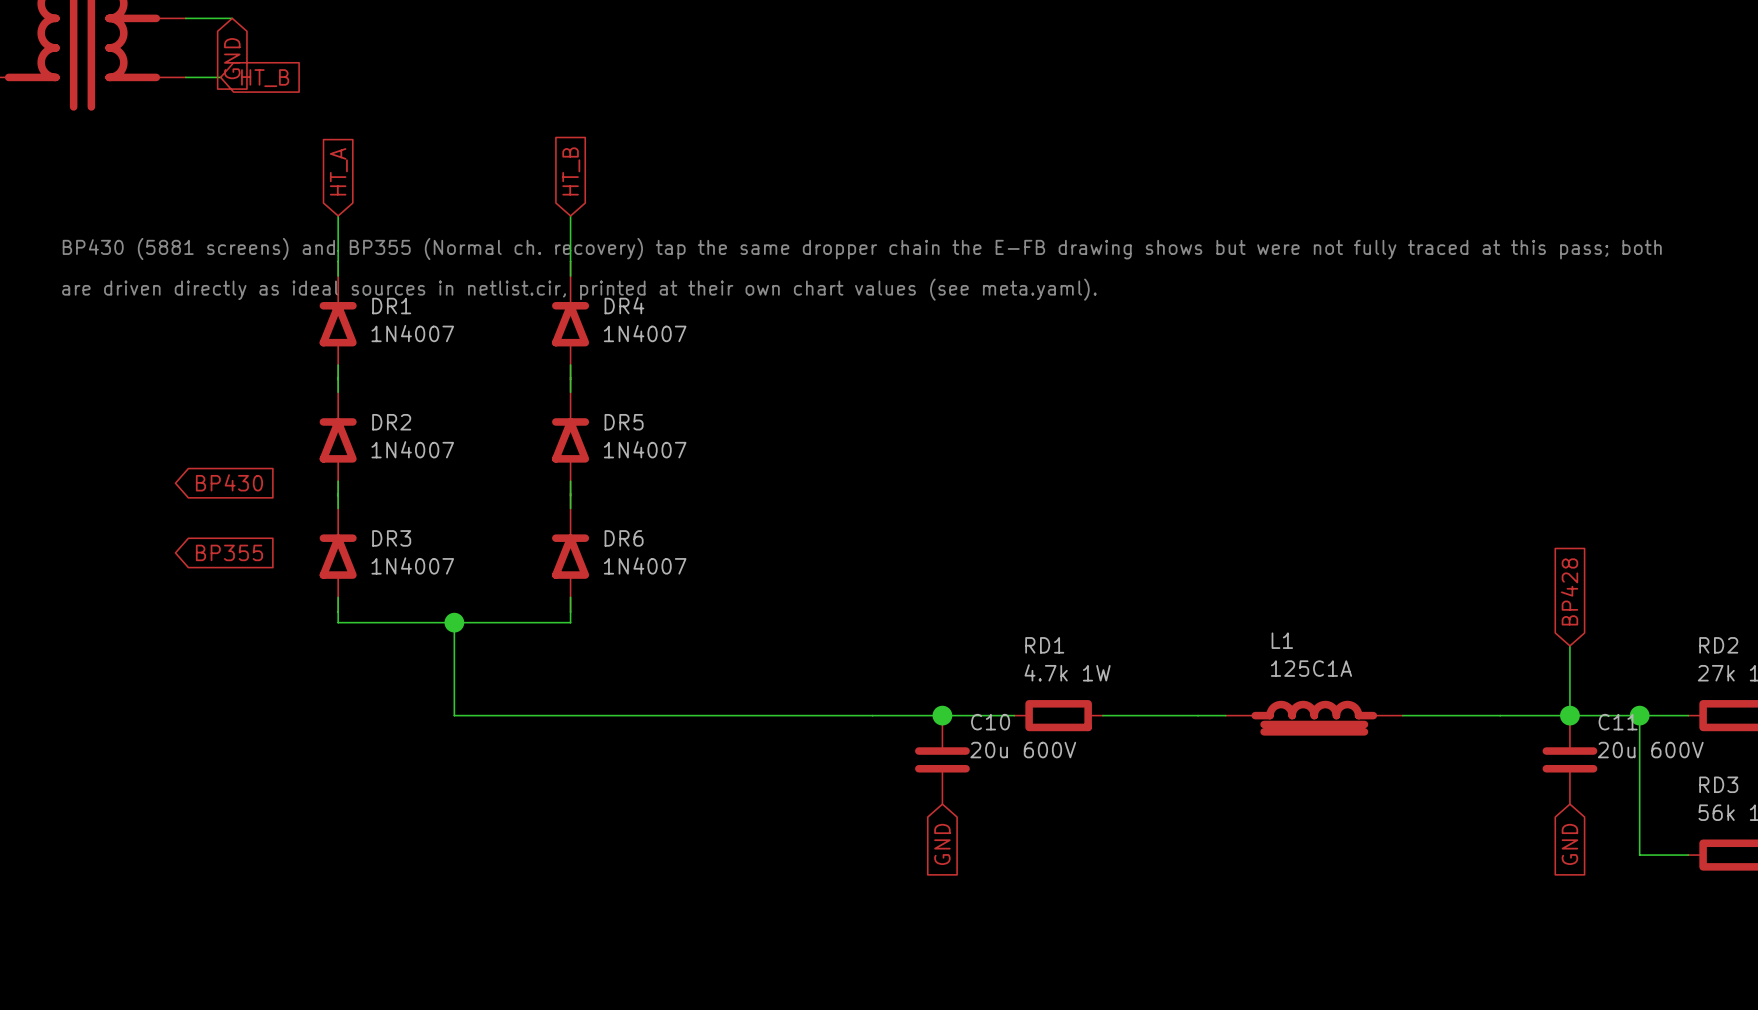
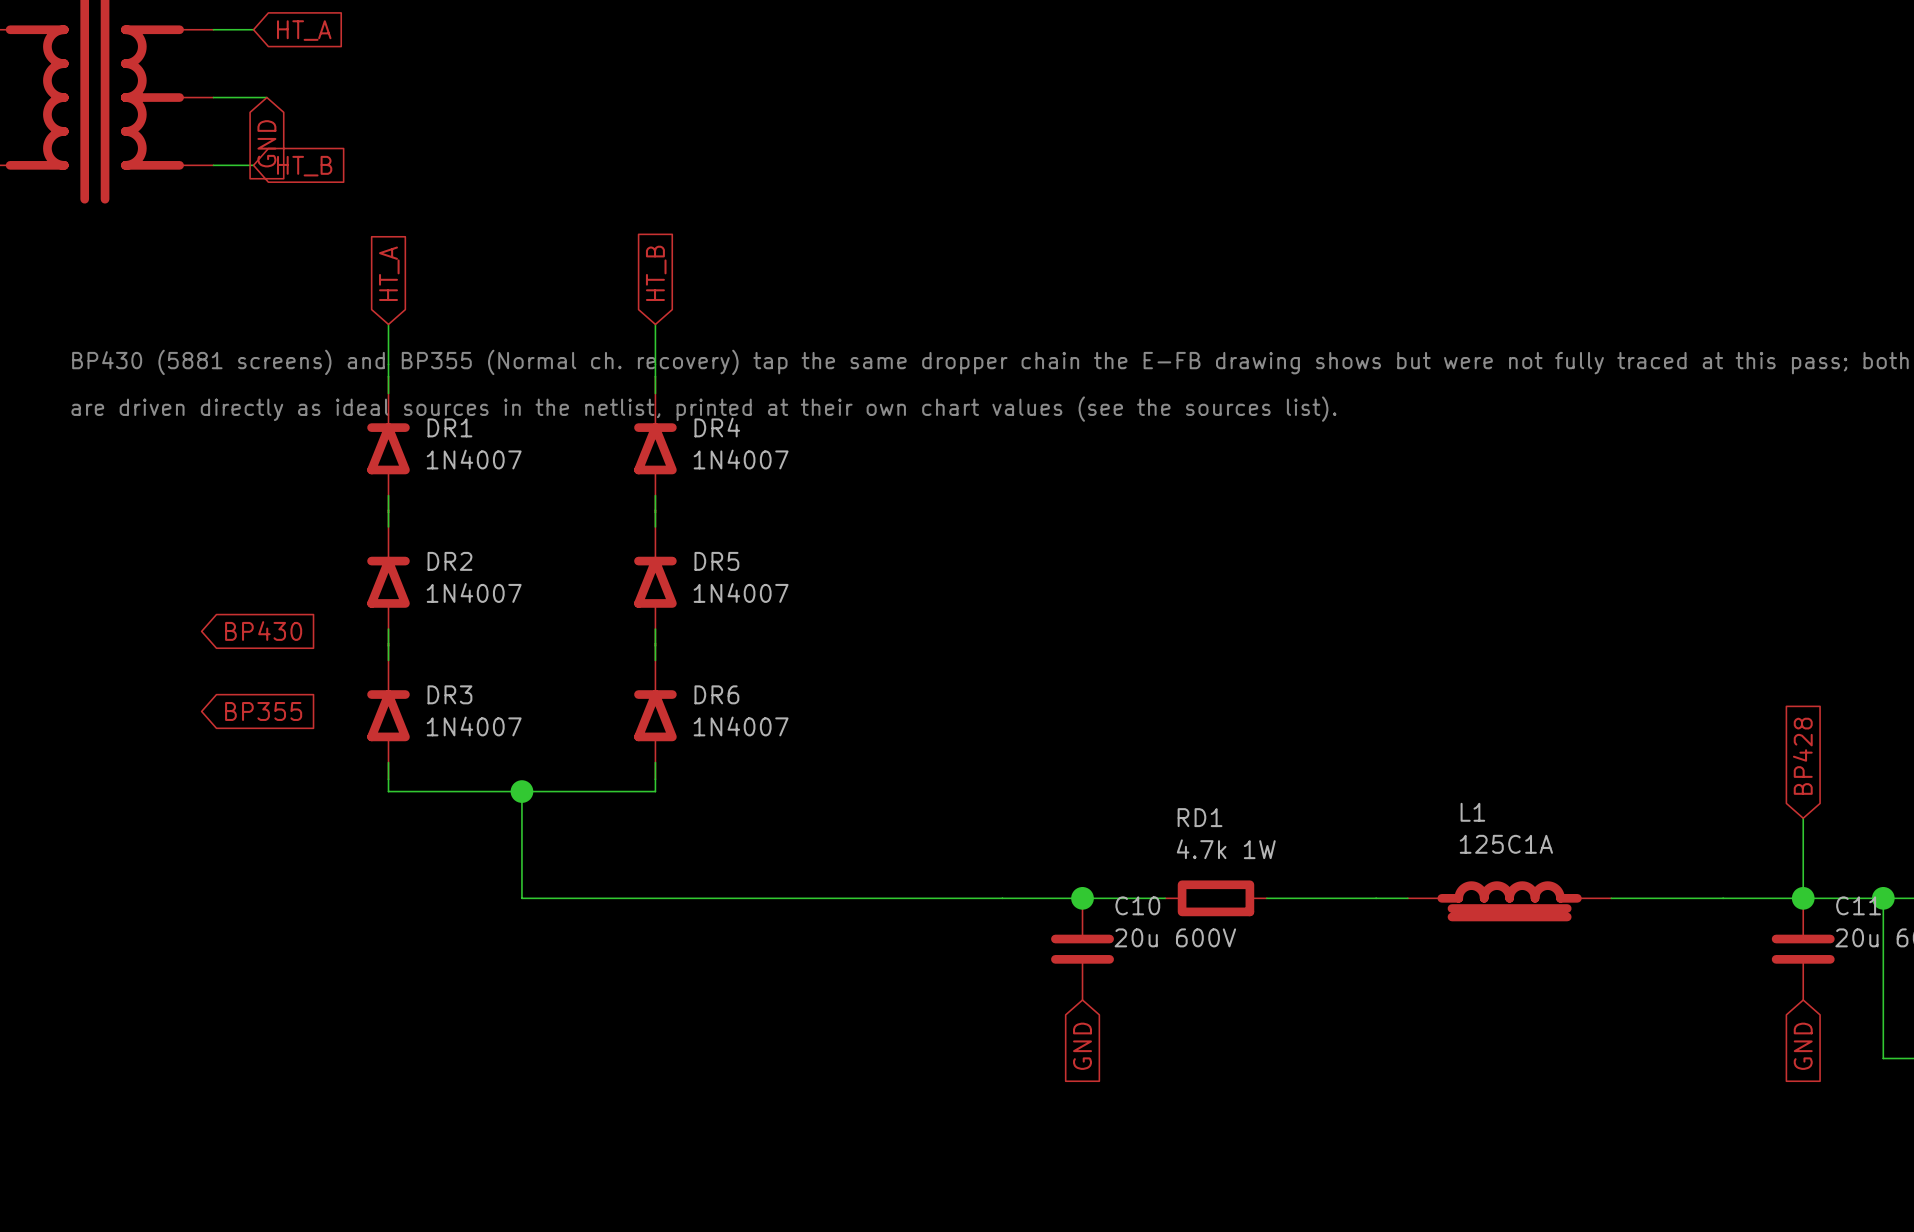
text: are driven directly as ideal sources in netlist.cir, printed at their own chart values (see meta.yaml). (579, 289) -> are driven directly as ideal sources in the netlist, printed at their own chart values (see the sources list). (703, 409)

